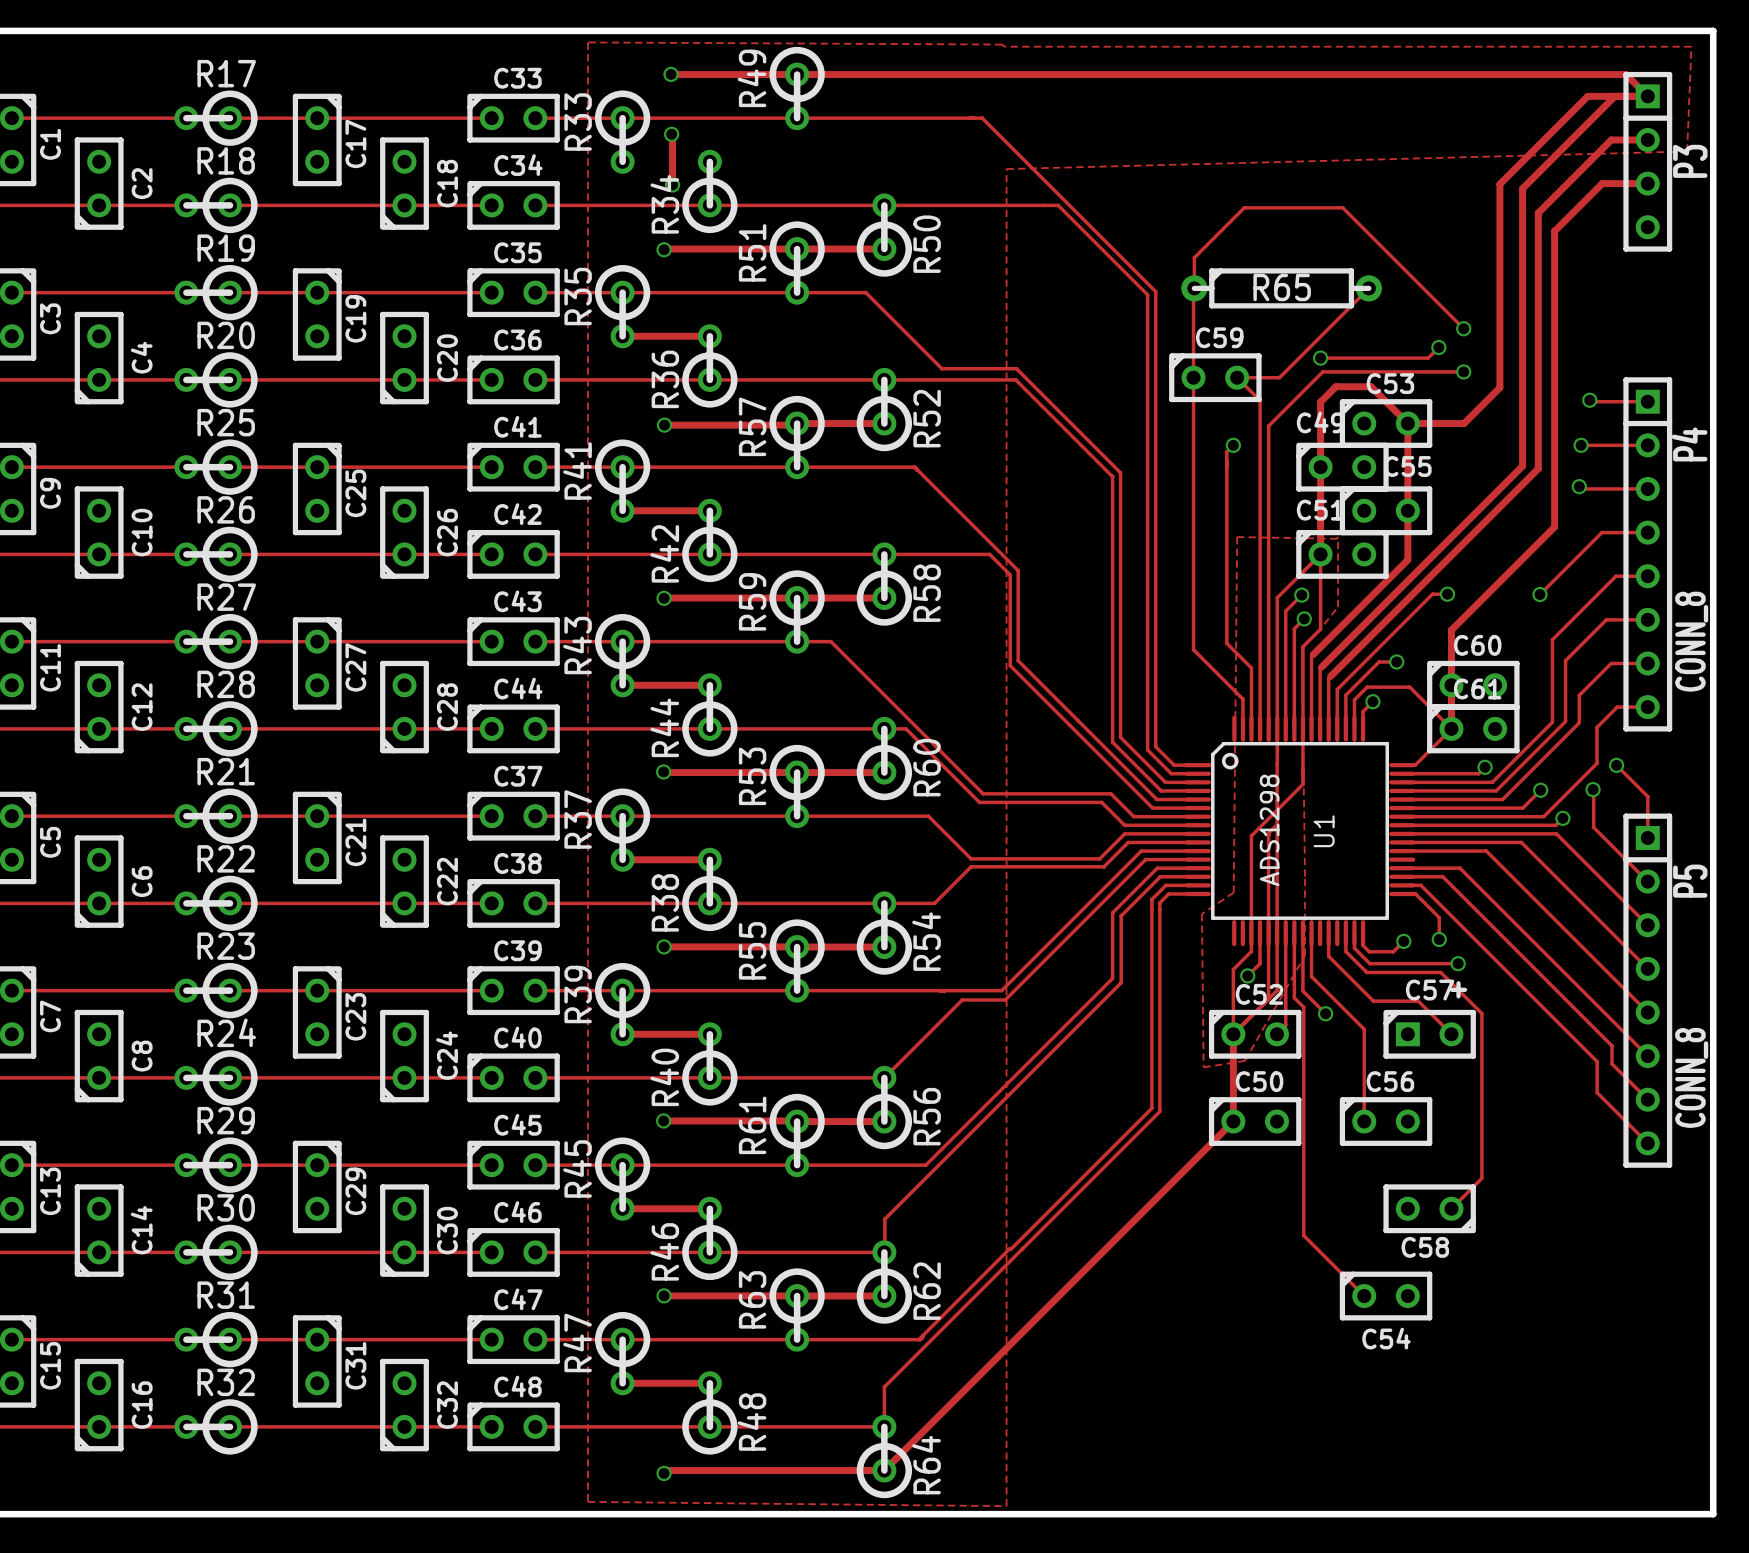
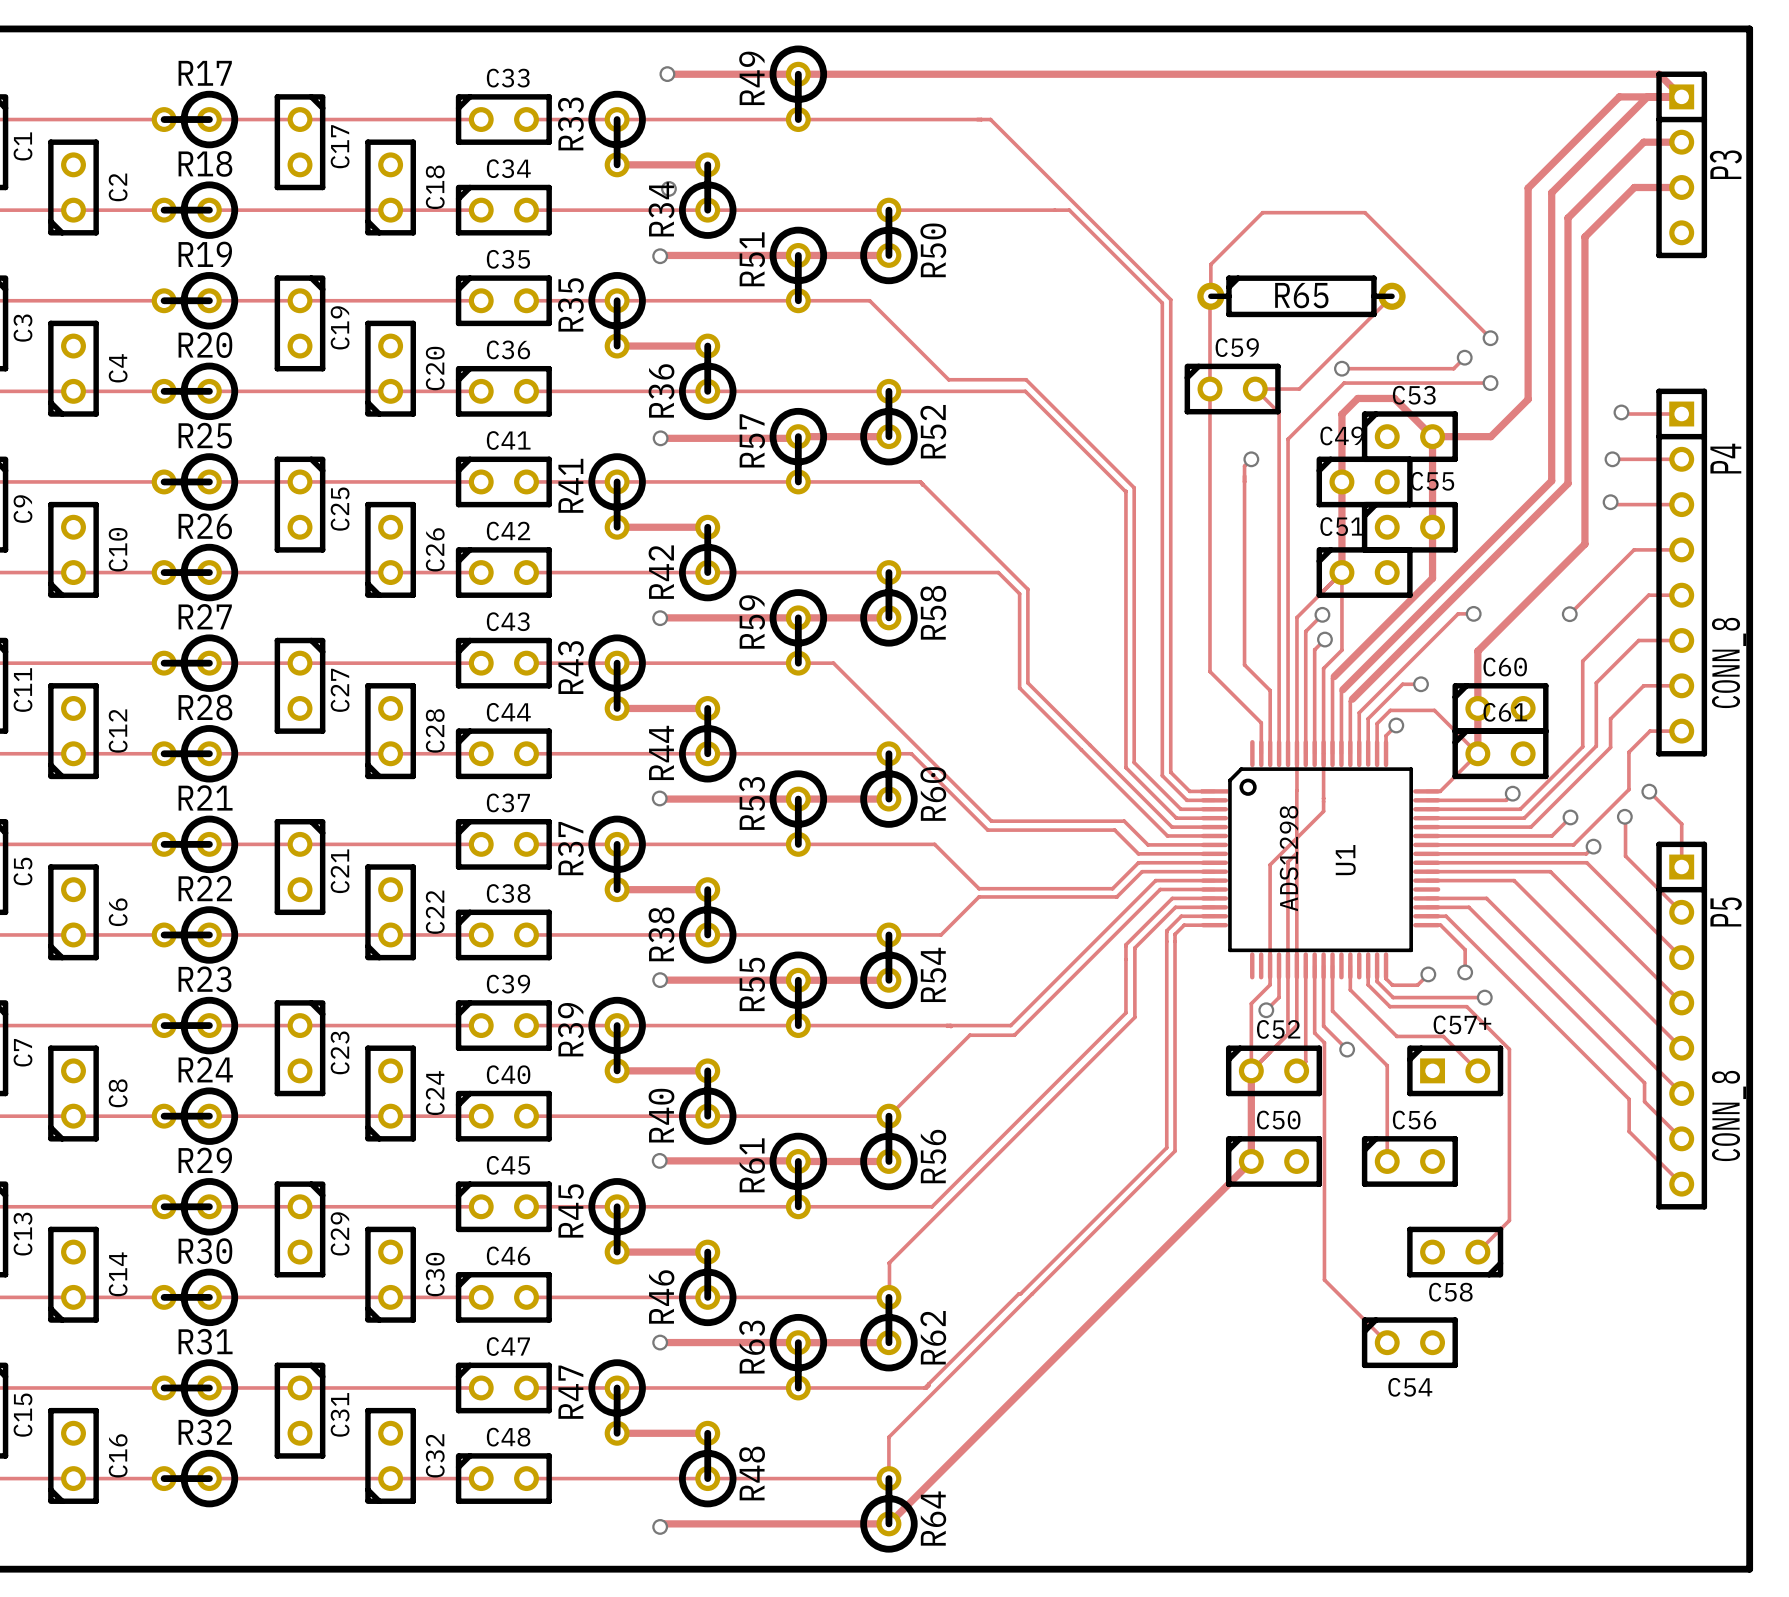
zone outline: (587, 42) (1002, 44) (1004, 46) (1691, 46) (1687, 151) (1006, 169) (1006, 1506) (587, 1501) (587, 42) -> none
track: (671, 134) (672, 184) -> none
via: (671, 134) -> none
track: none -> (617, 164) (707, 164)
zone outline: (1237, 537) (1337, 538) (1338, 537) (1338, 607) (1316, 633) (1301, 646) (1305, 955) (1244, 1060) (1203, 1067) (1201, 914) (1233, 892) (1237, 537) -> none

